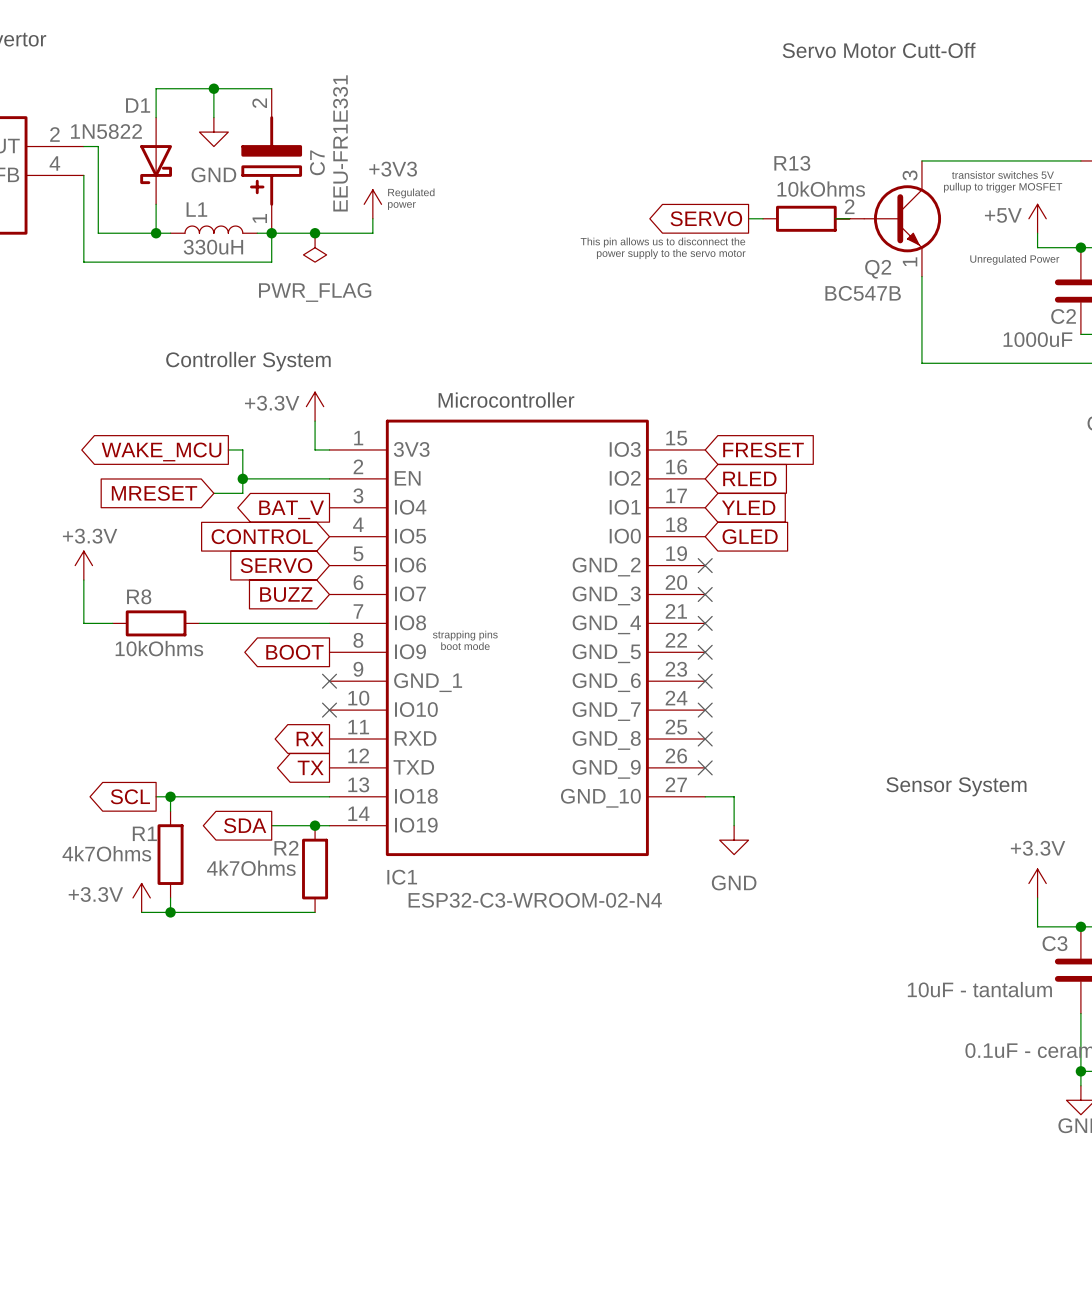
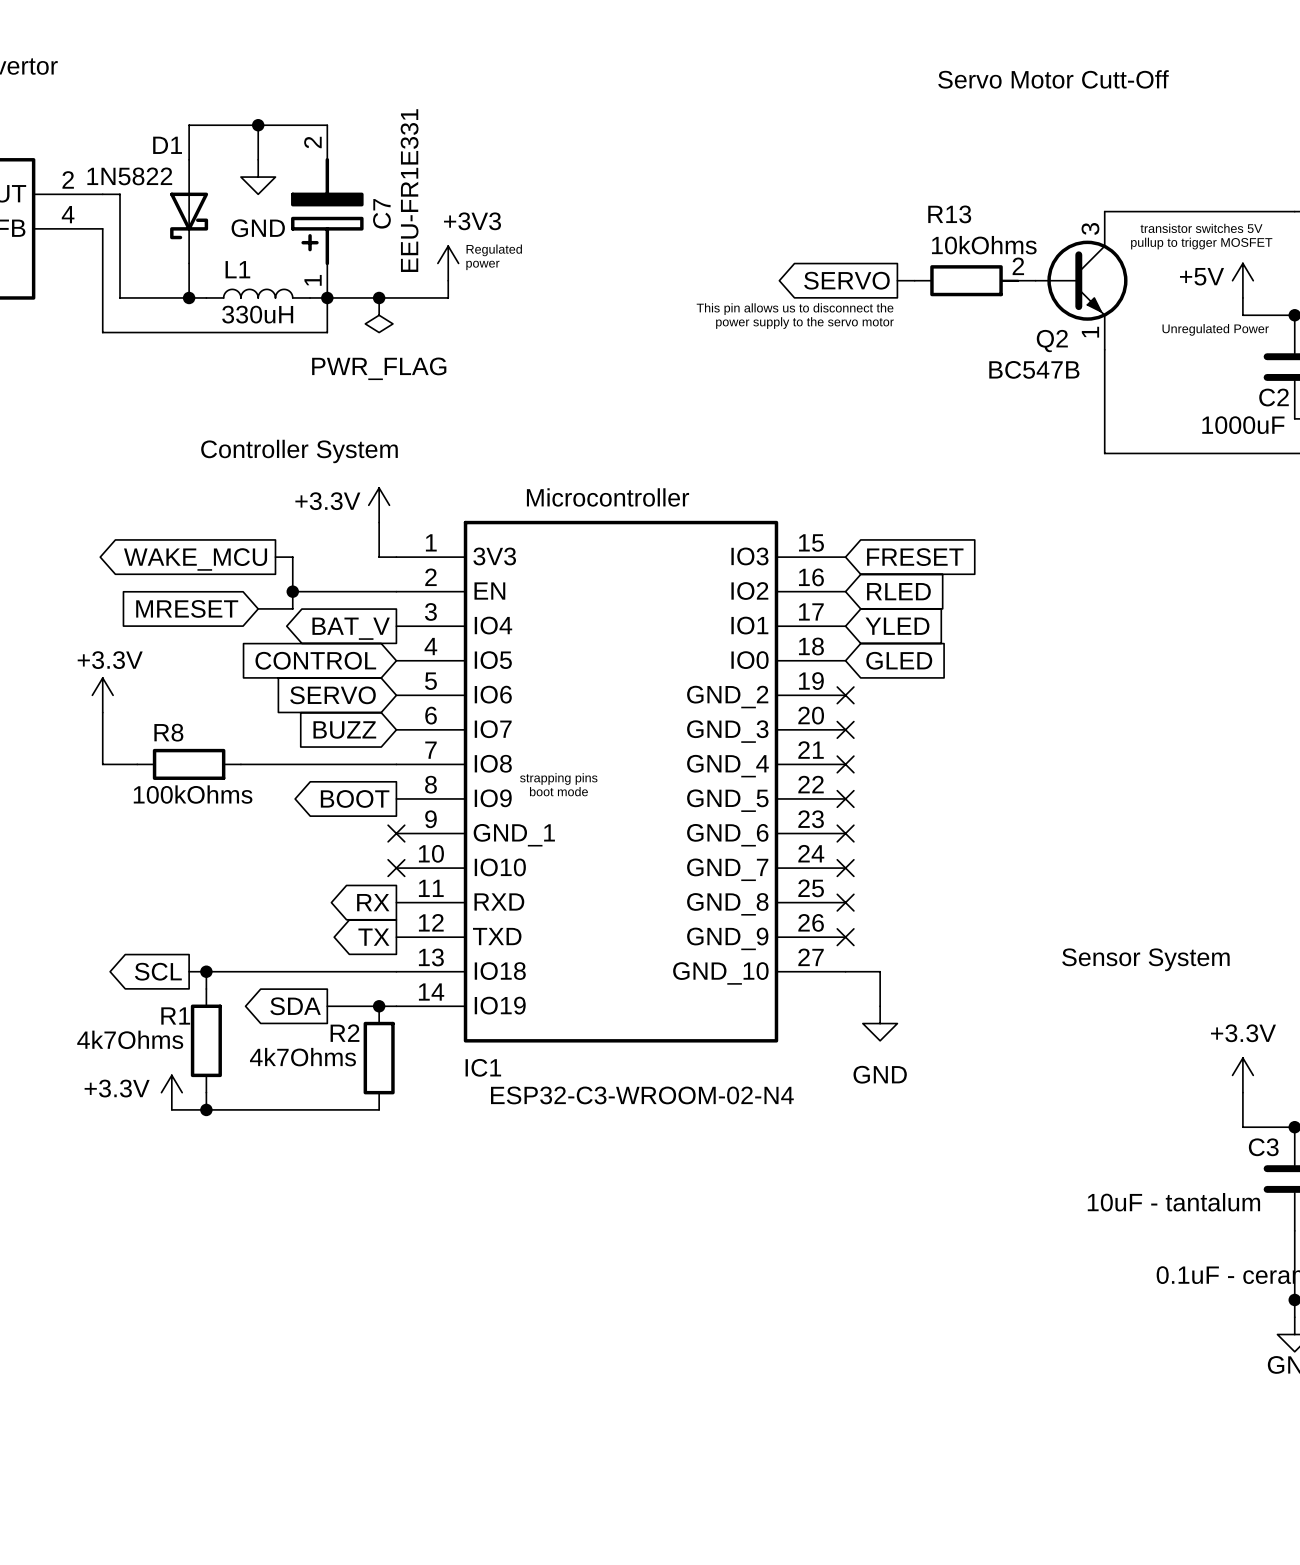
R8 value: 10kOhms (159, 648) -> 100kOhms (193, 794)

